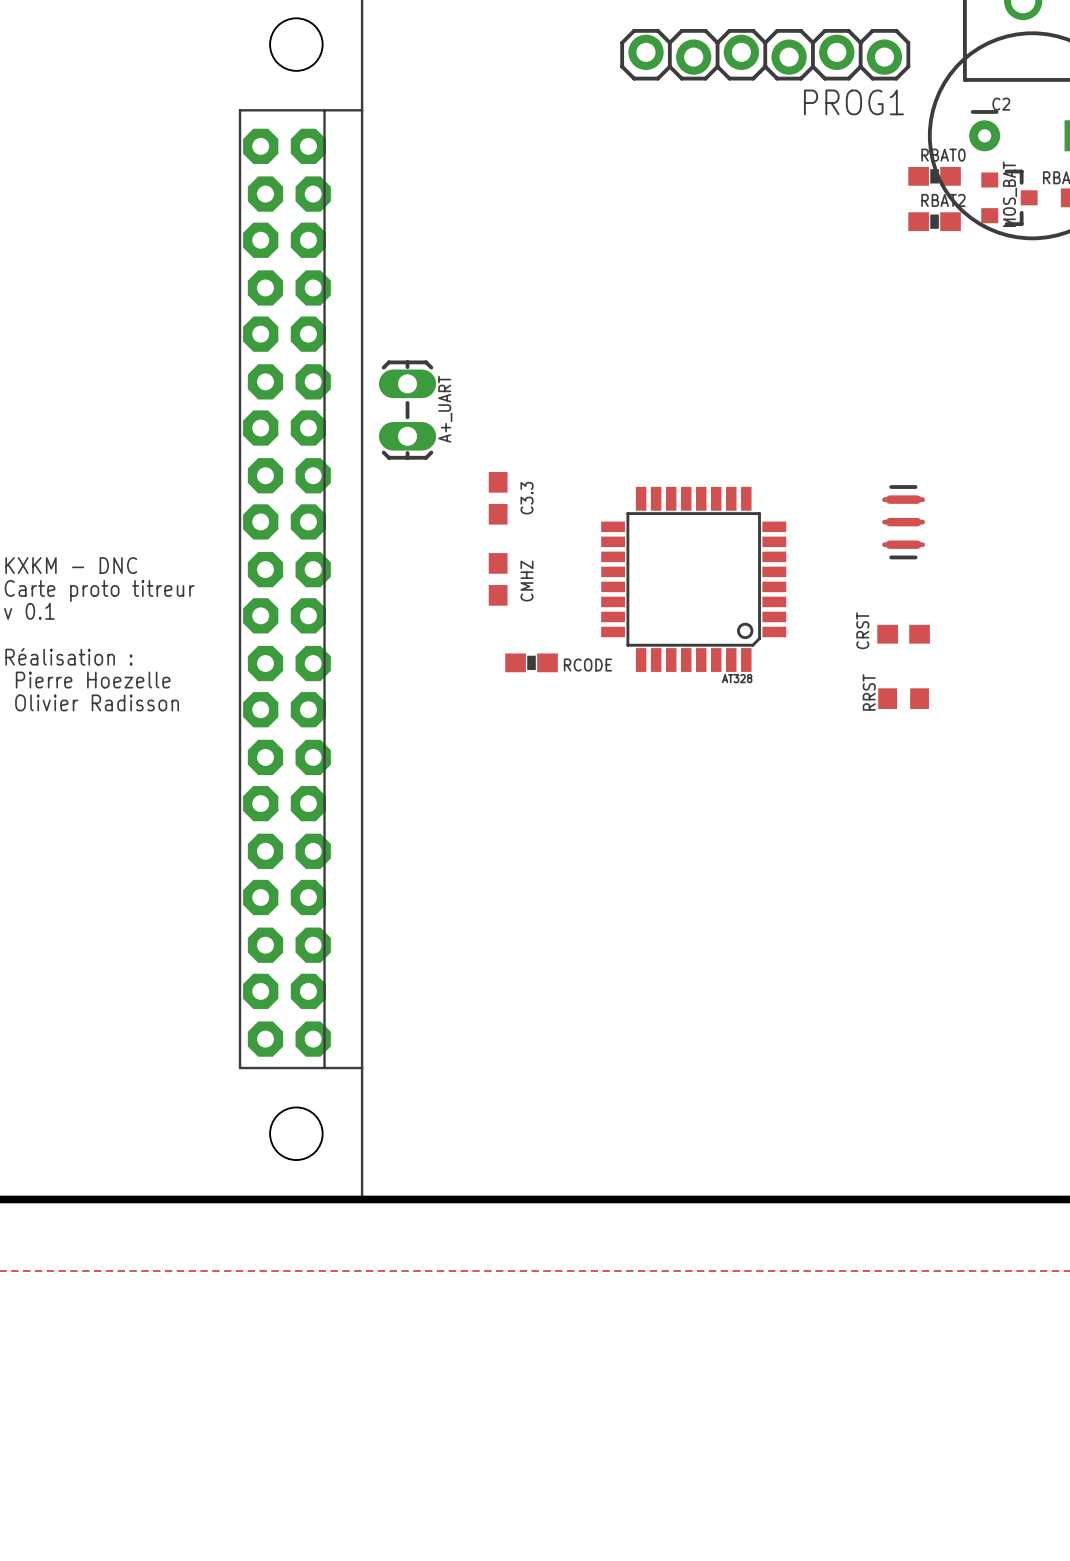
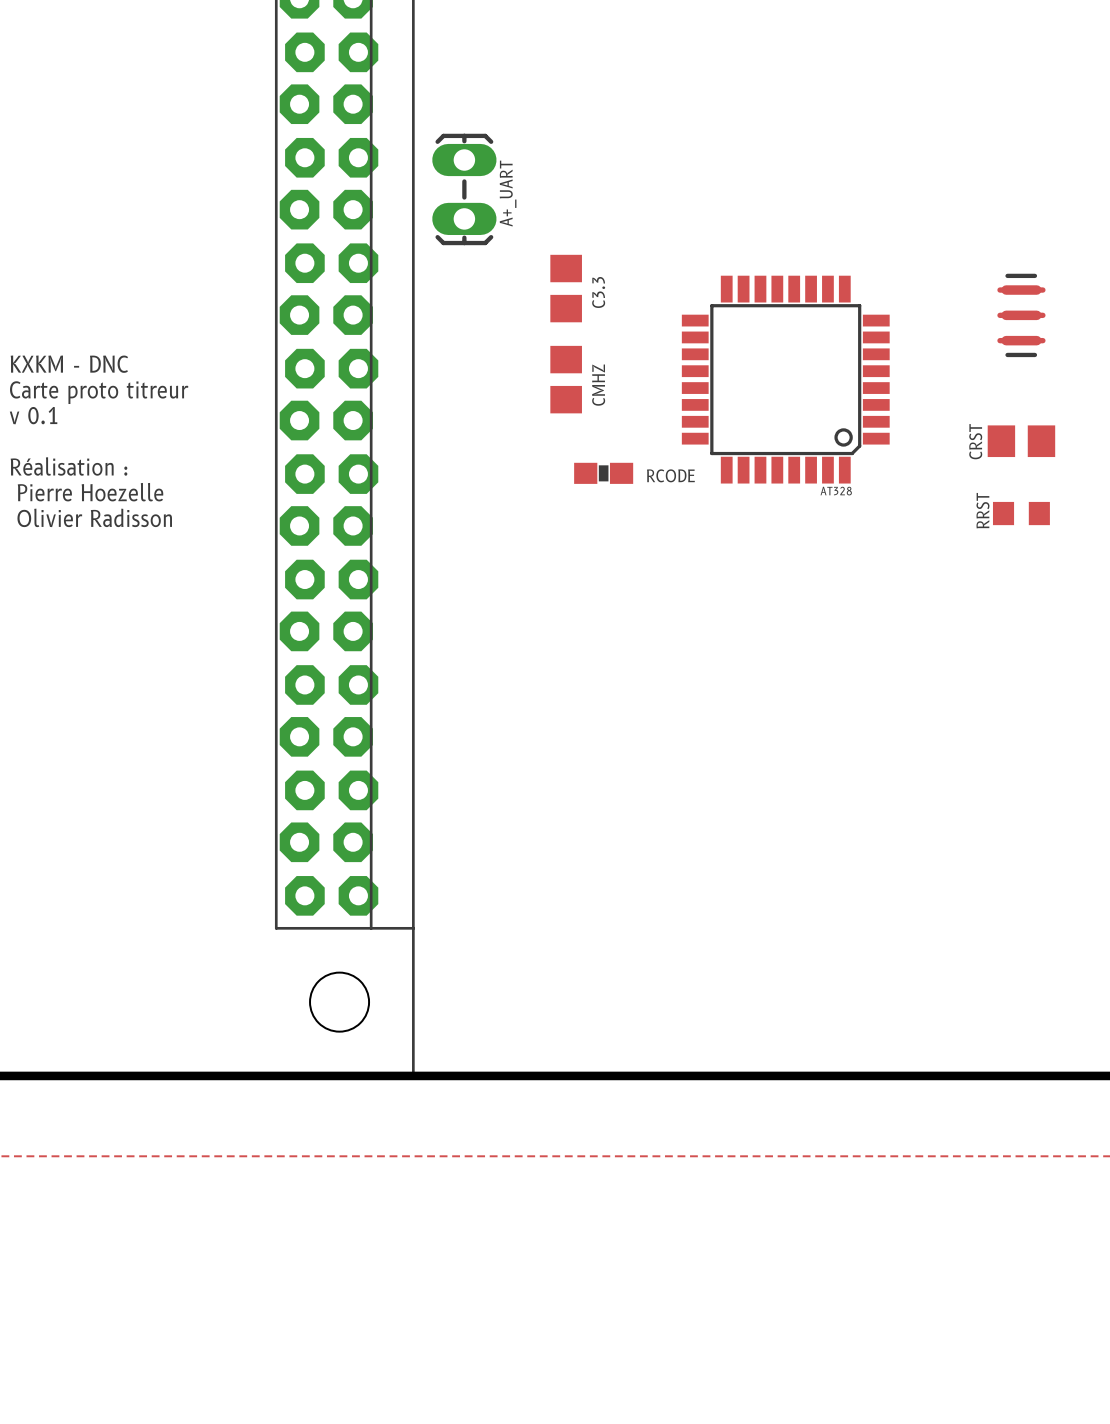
C3.3 footprint: [488, 472, 508, 525] -> [550, 254, 582, 323]
CMHZ footprint: [488, 553, 508, 606] -> [550, 345, 582, 414]
CRST footprint: [877, 624, 930, 644] -> [987, 425, 1056, 458]

